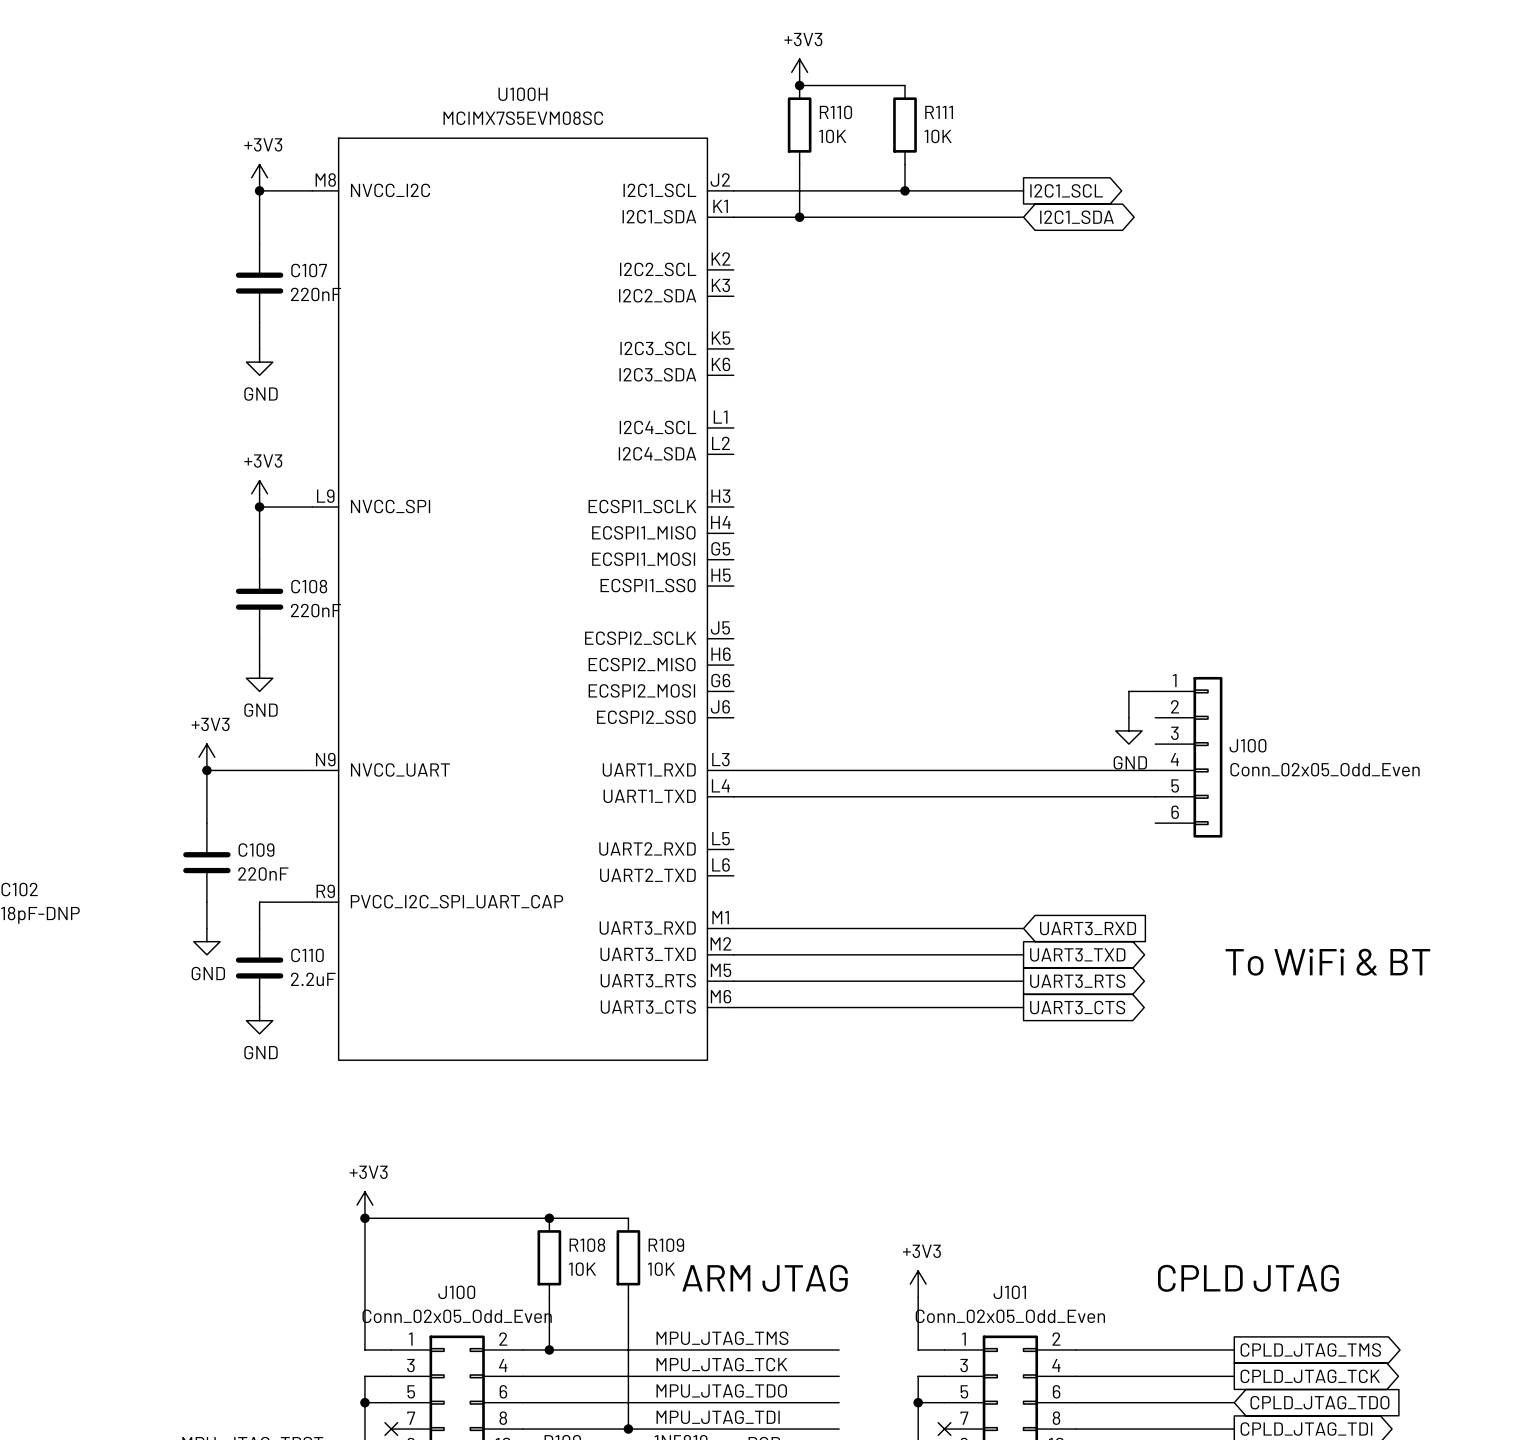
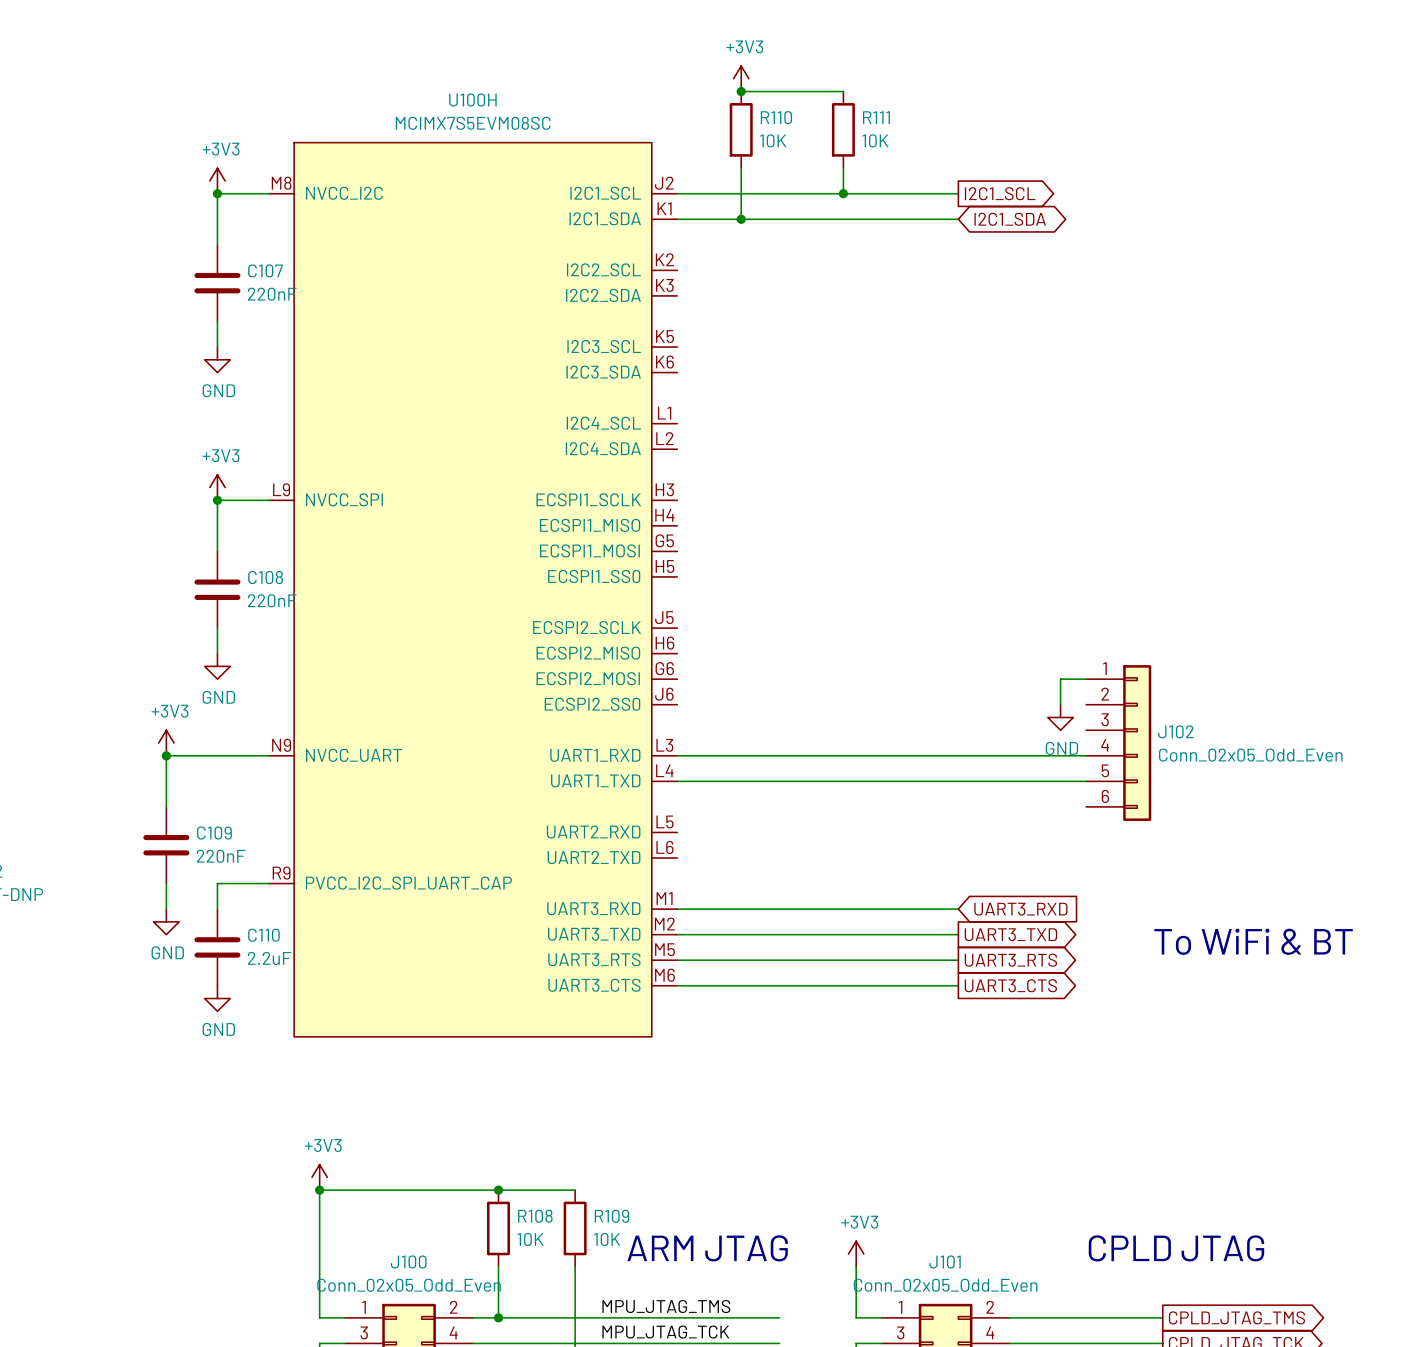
J100 name: J100 (1247, 745) -> J102 (1175, 731)

